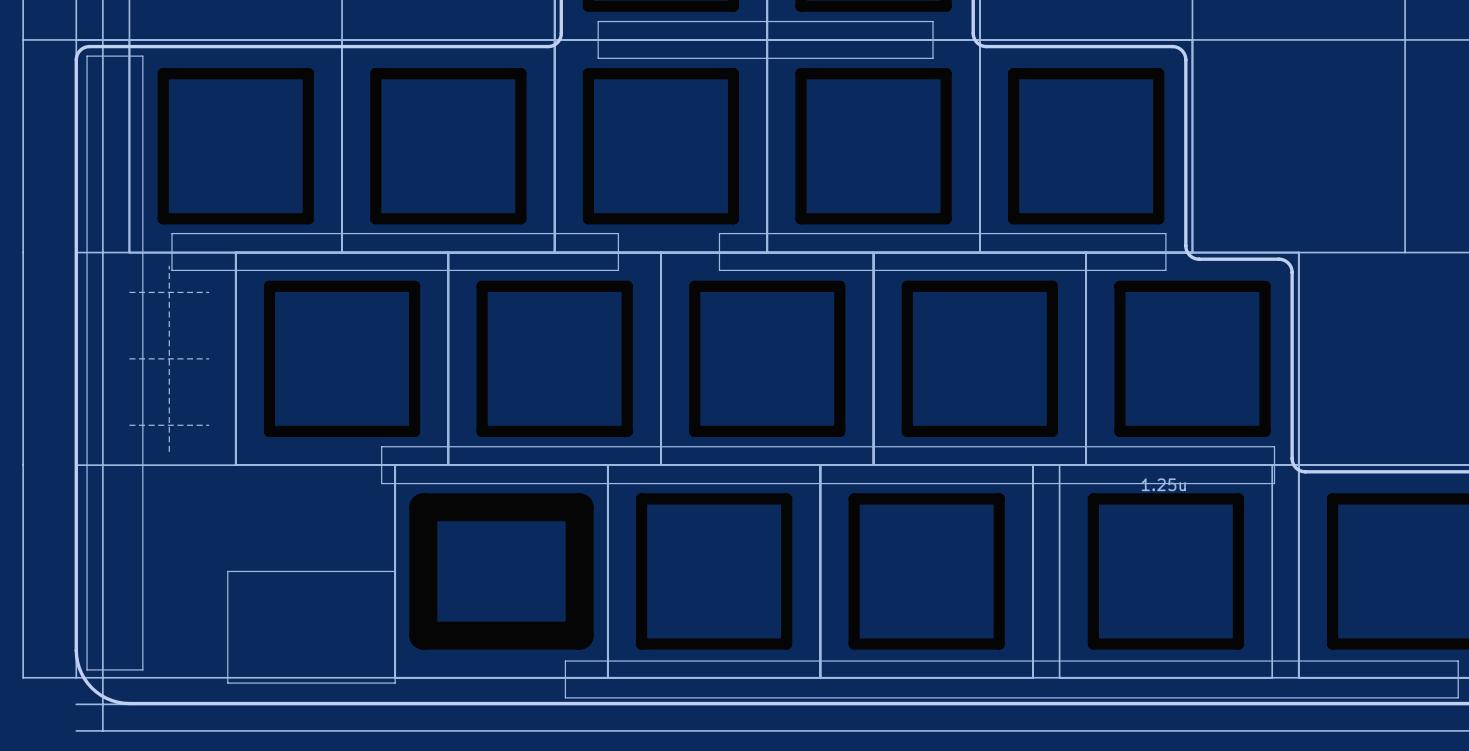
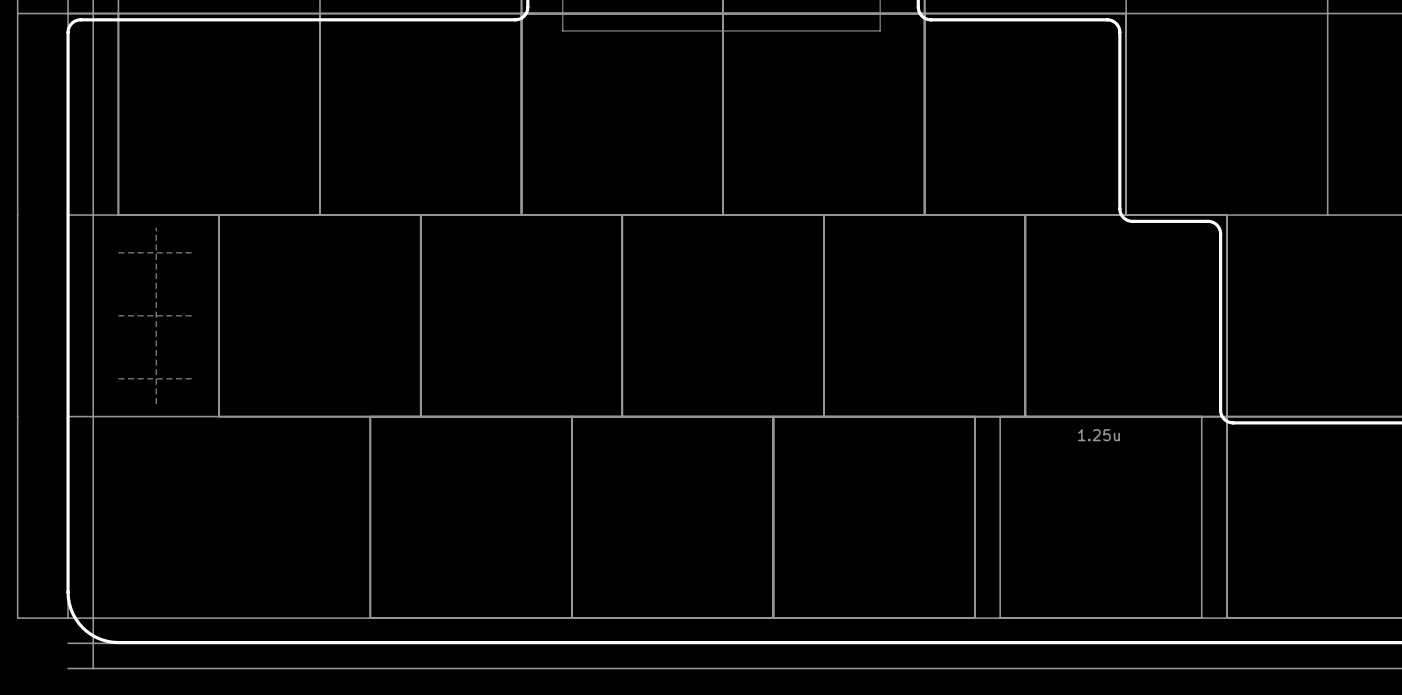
line: (87, 56) (142, 56) (142, 669) (87, 669) (87, 56) -> none
line: (171, 233) (618, 233) (618, 270) (171, 270) (171, 233) -> none
line: (719, 233) (1165, 233) (1165, 270) (719, 270) (719, 233) -> none
line: (381, 446) (1274, 446) (1274, 483) (381, 483) (381, 446) -> none
line: (227, 571) (395, 571) (395, 683) (227, 683) (227, 571) -> none
line: (565, 661) (1458, 661) (1458, 697) (565, 697) (565, 661) -> none

